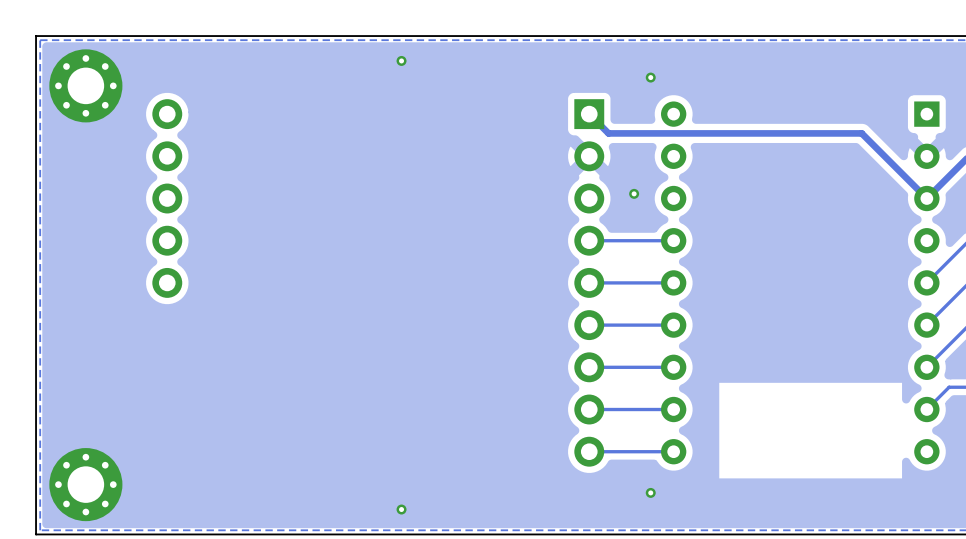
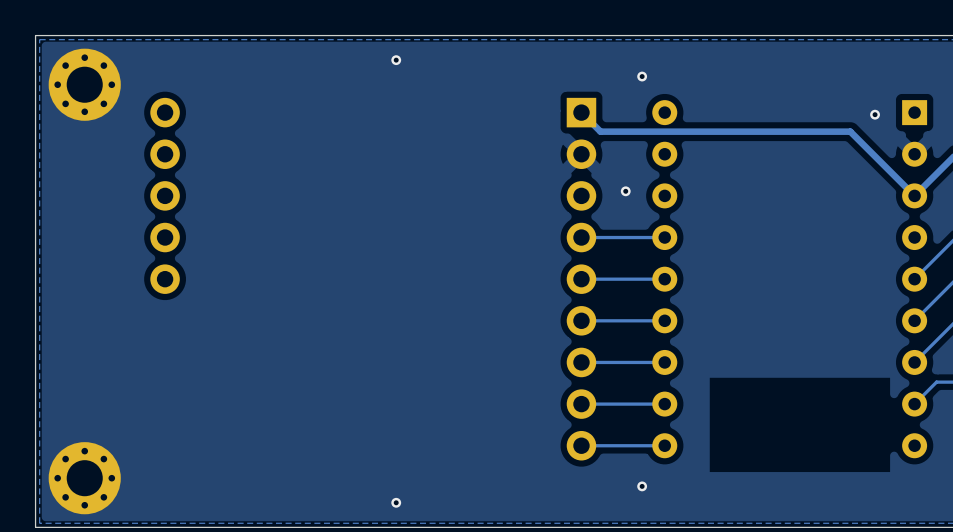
via: none -> (875, 114)

